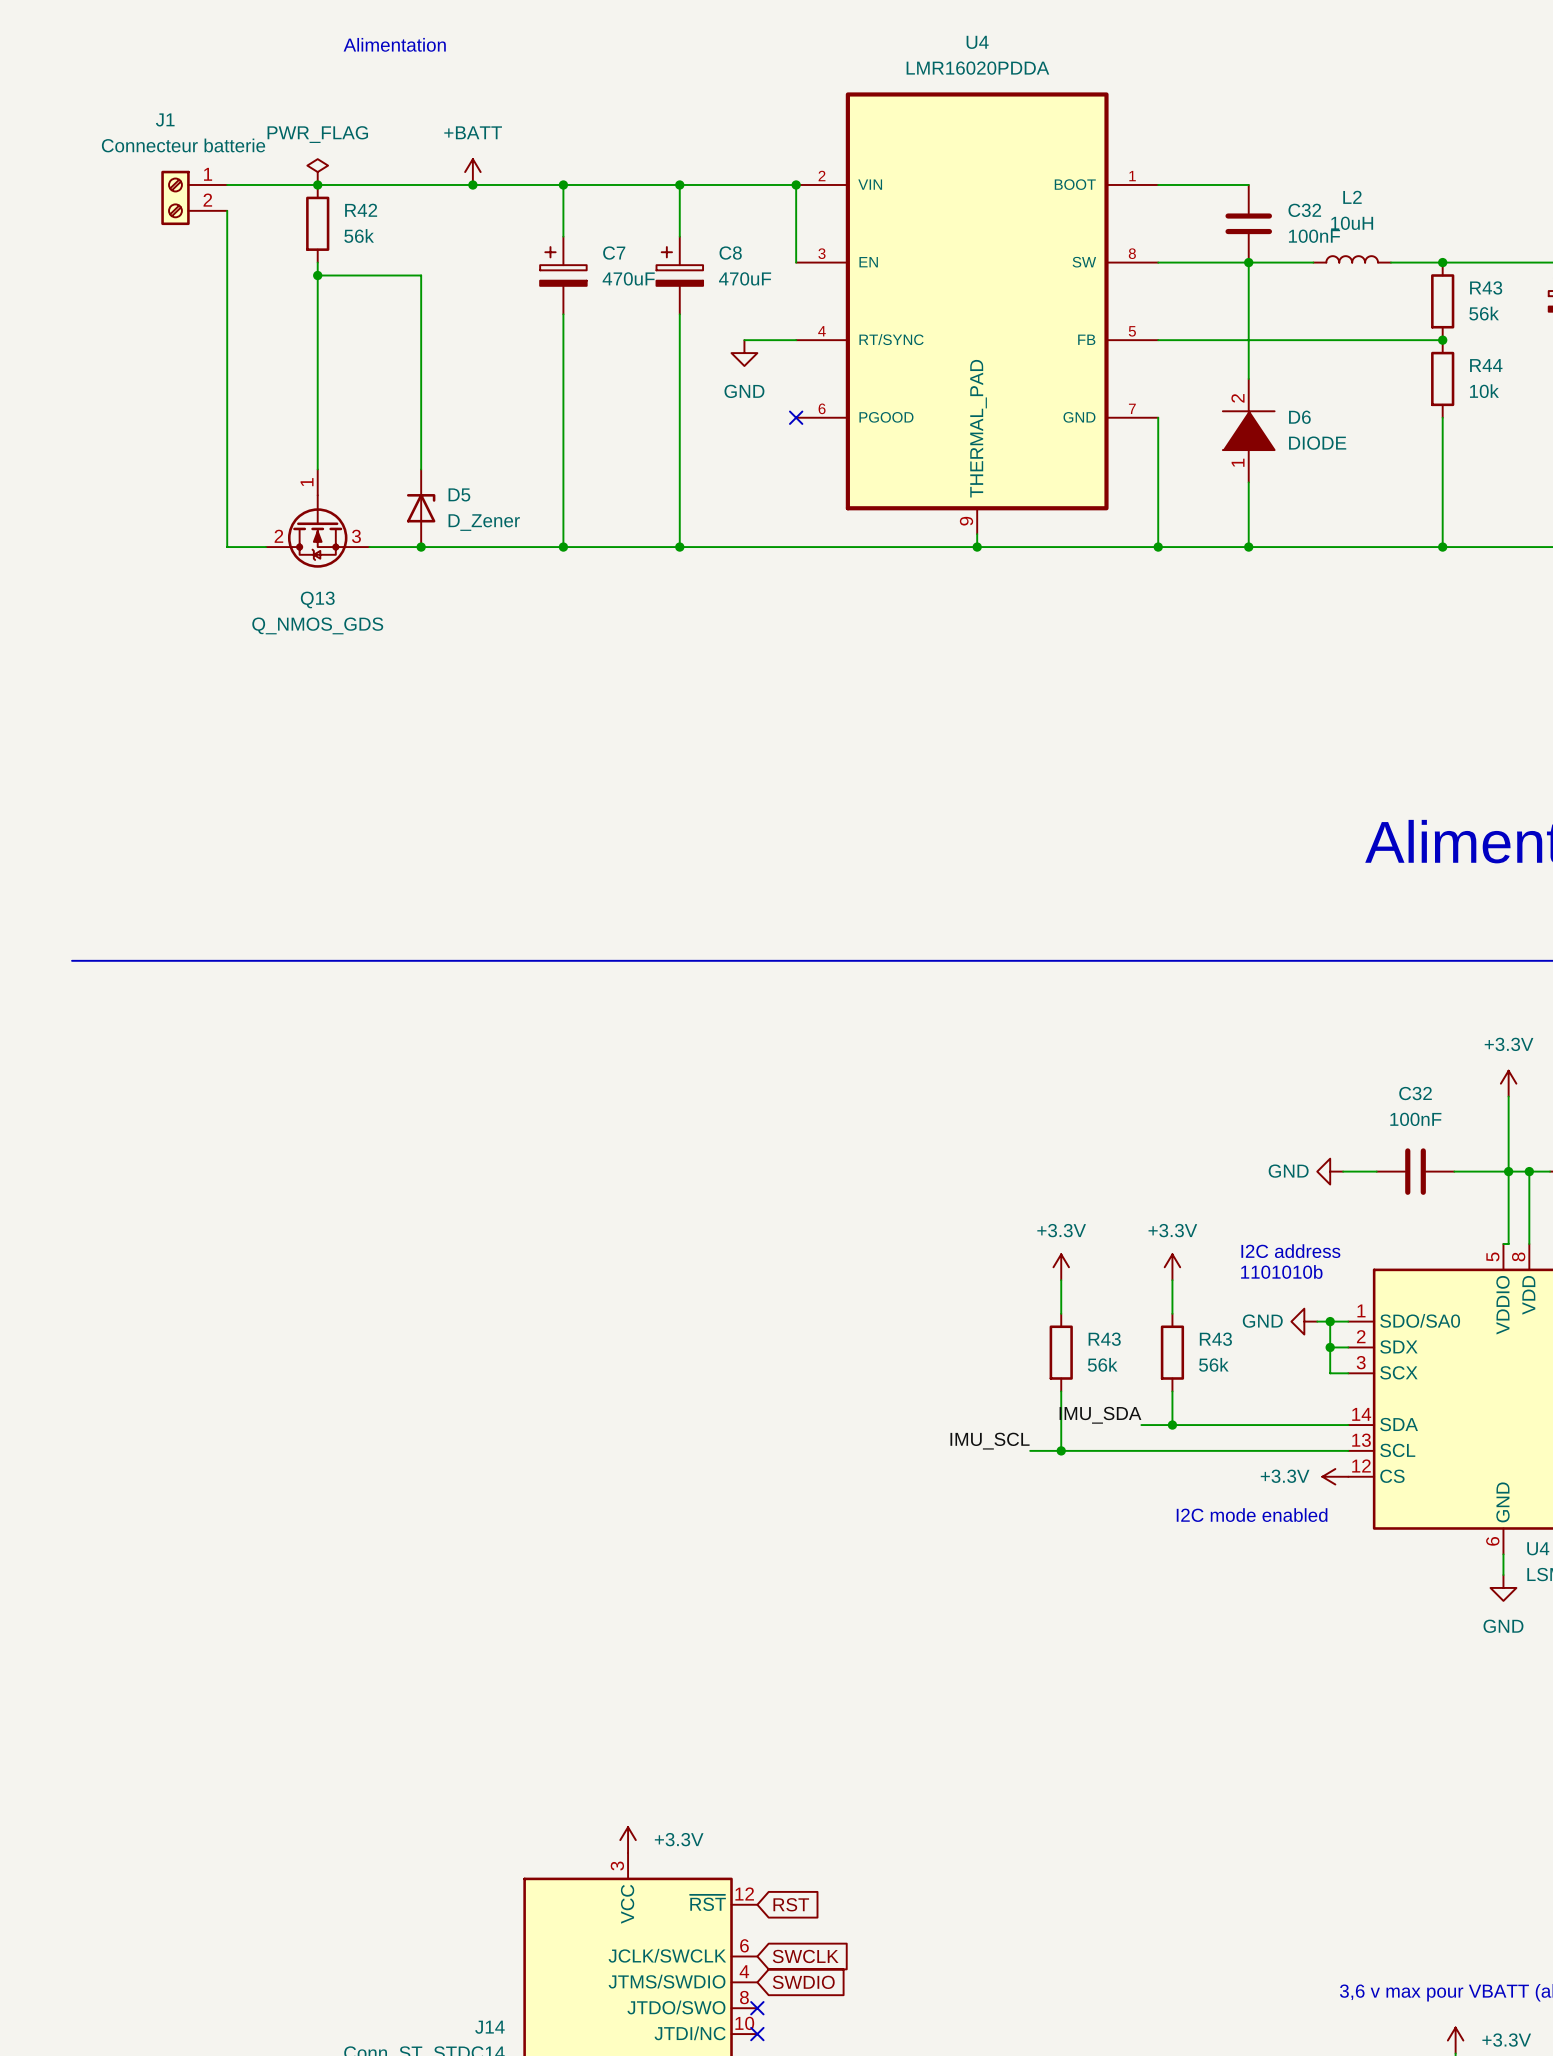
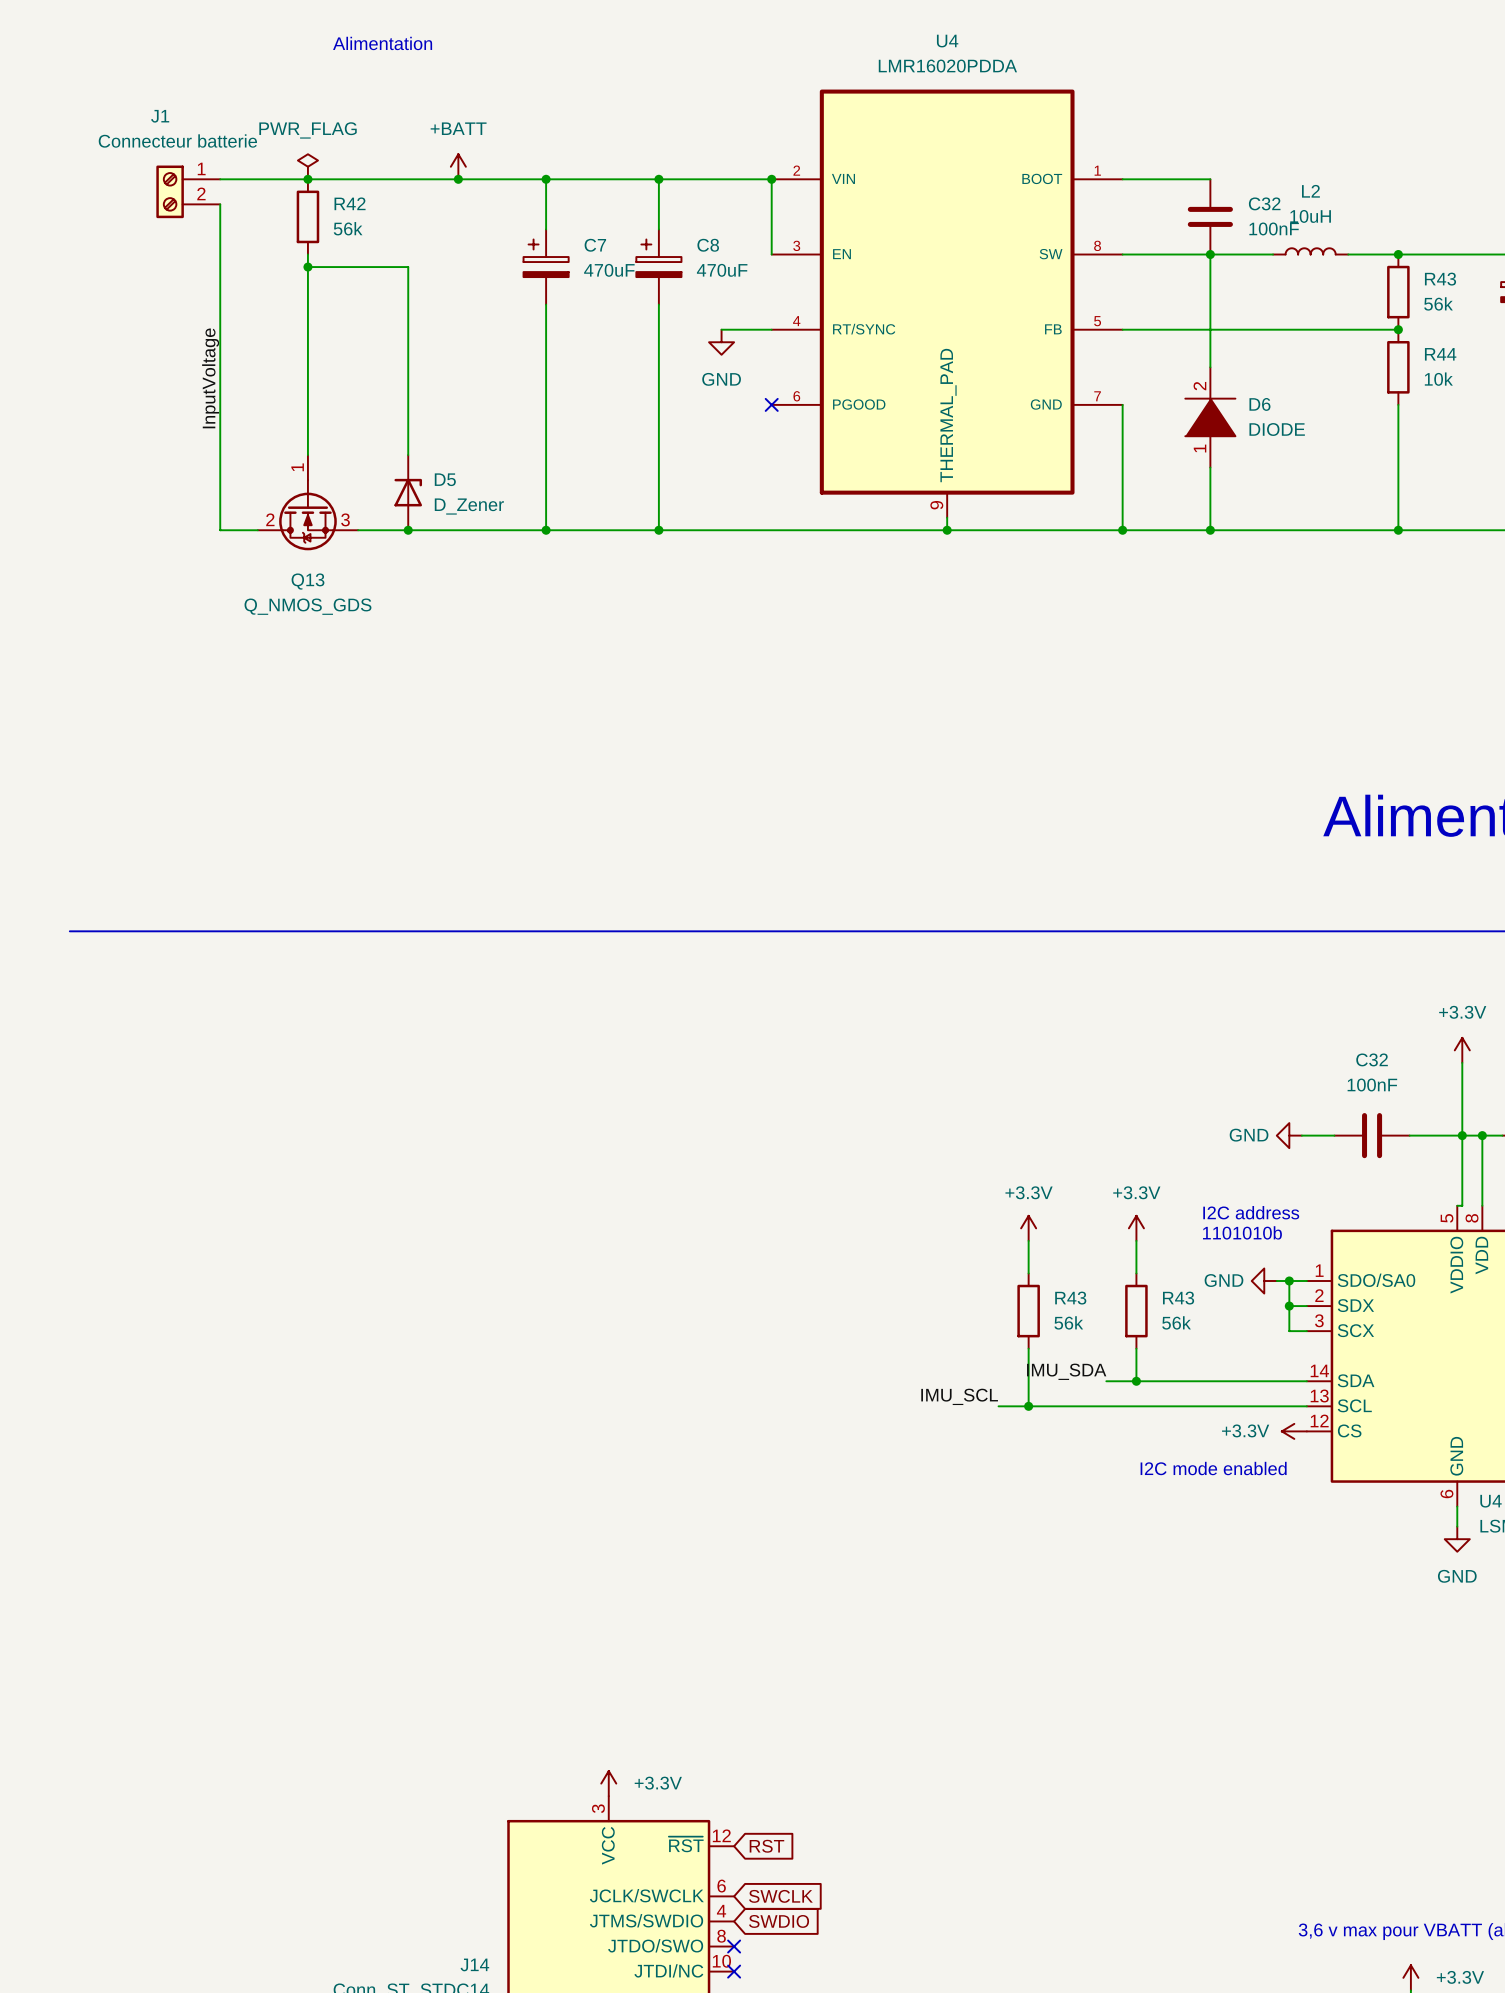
label: none -> InputVoltage (210, 378)

